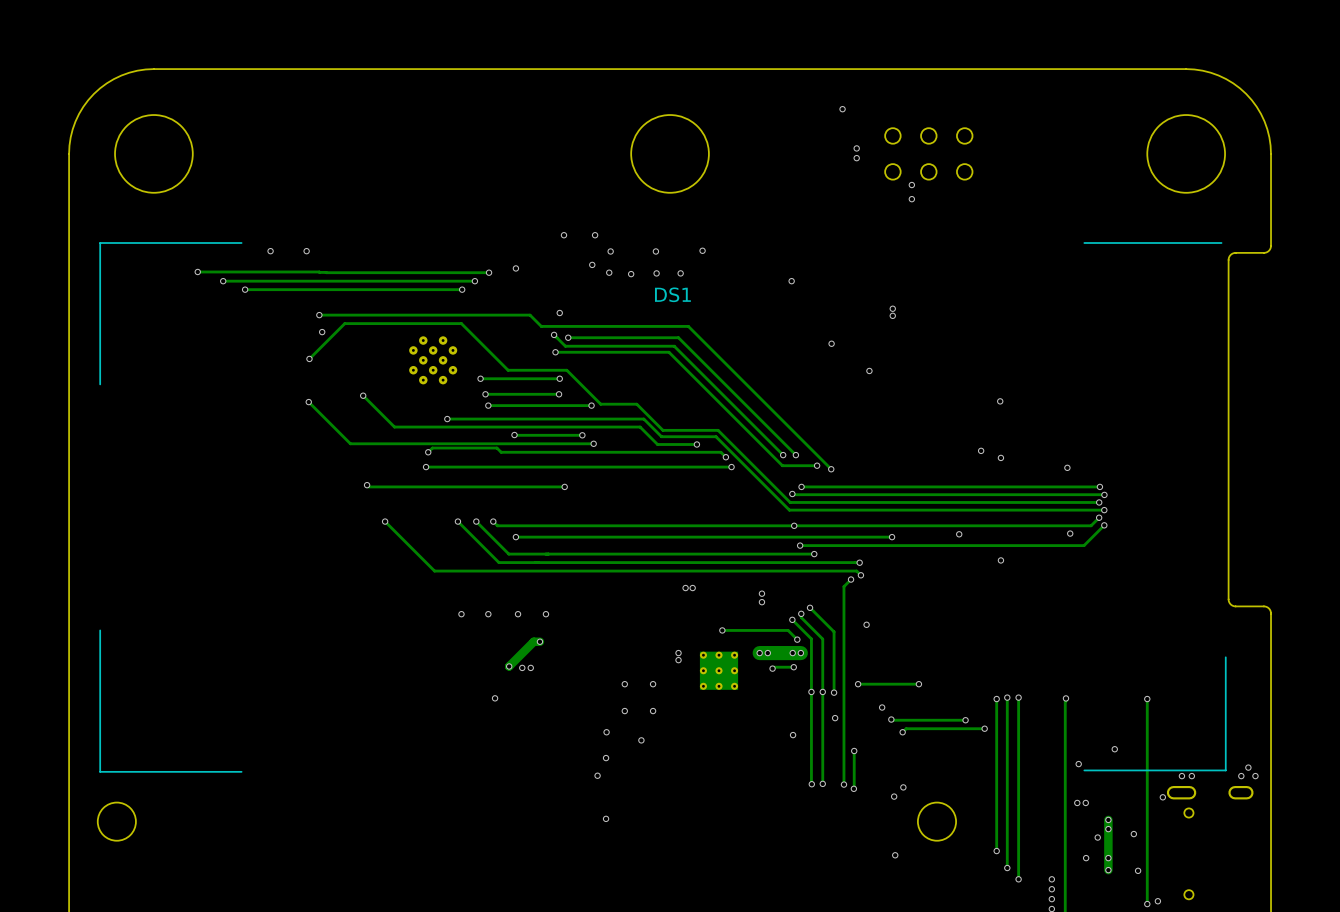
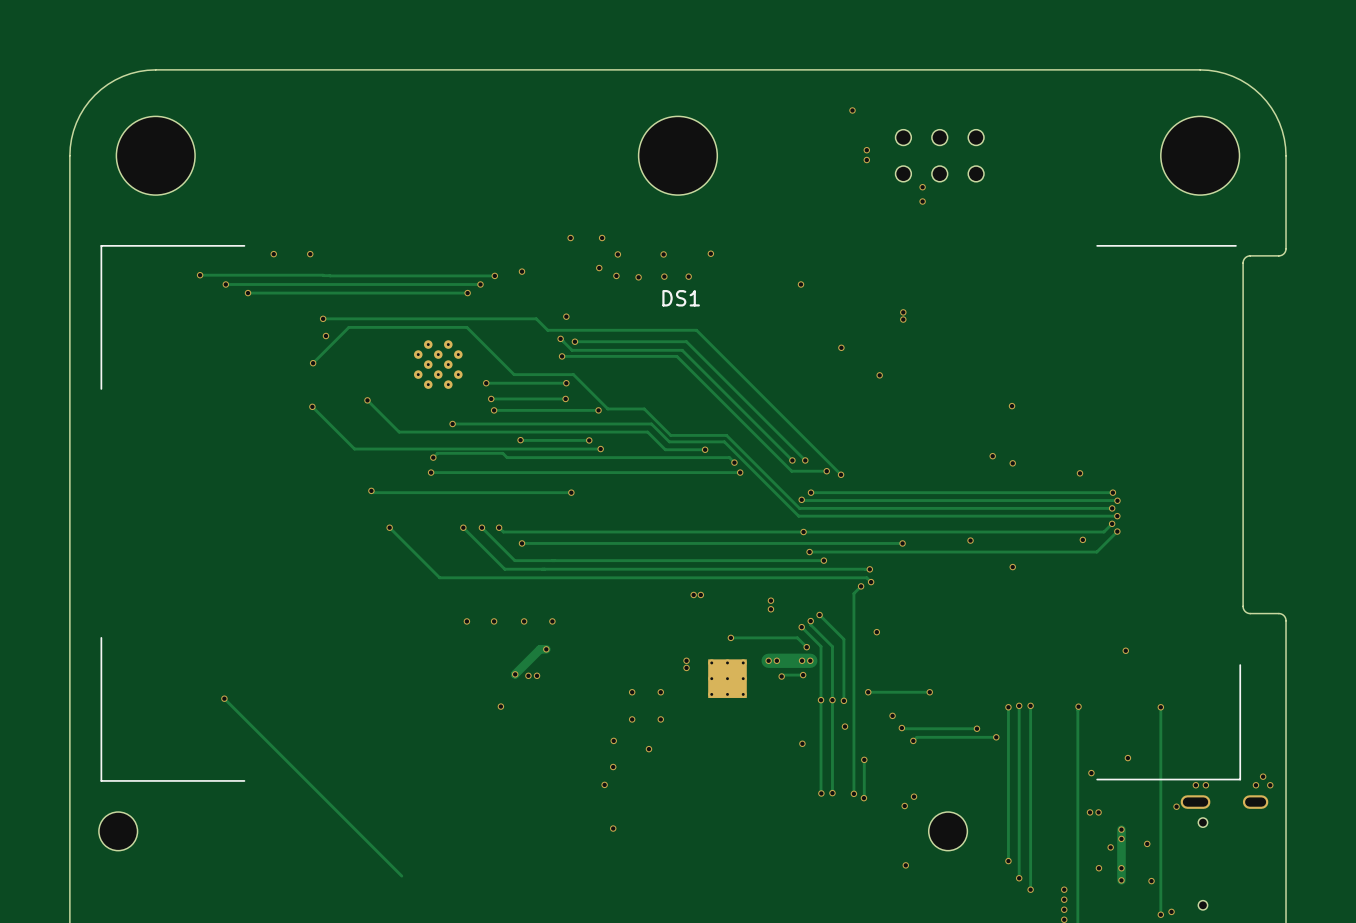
via: none -> (1125, 650)
track: none -> (224, 698) (401, 876)
via: none -> (224, 698)

